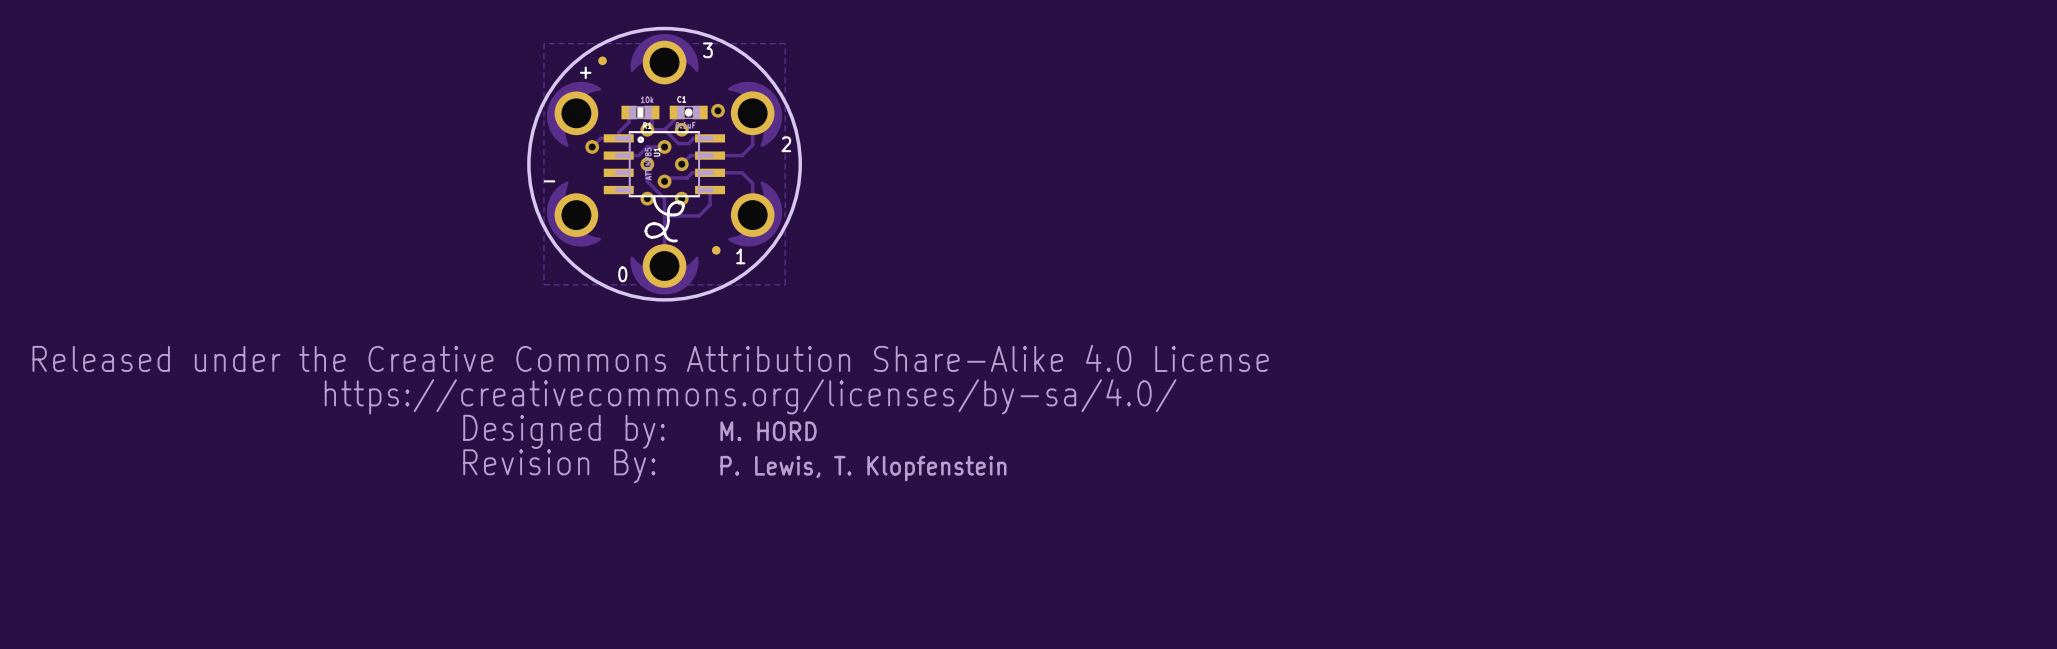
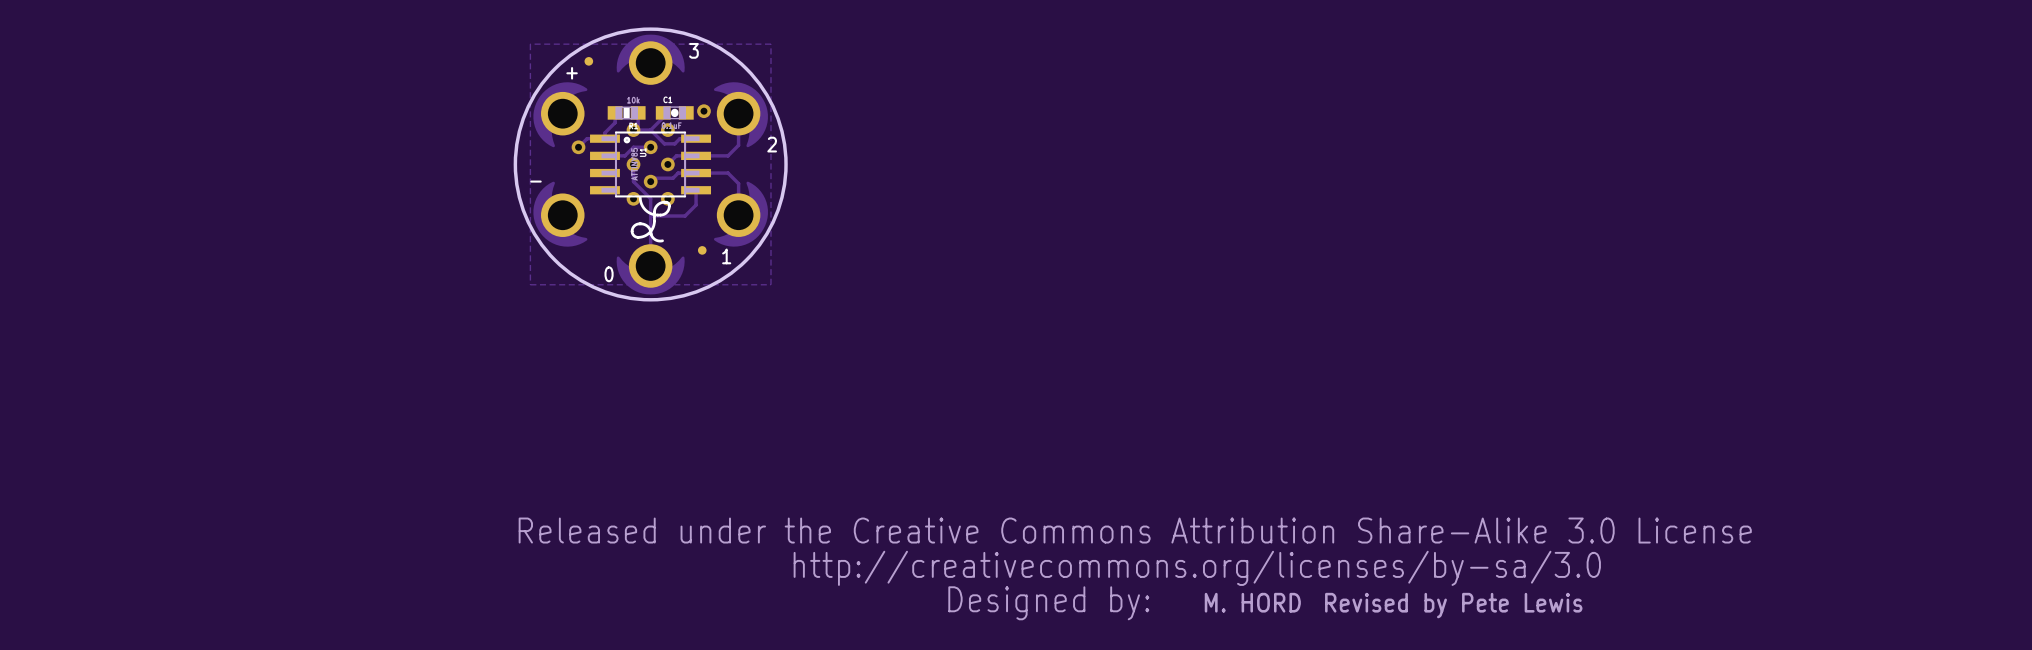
drawing: [32, 344, 1269, 484] -> none
text: M. HORD (768, 431) -> none
text: P. Lewis, T. Klopfenstein (863, 468) -> none
drawing: none -> [518, 517, 1752, 621]
text: none -> M. HORD (1252, 602)
text: none -> Revised by Pete Lewis (1453, 605)

